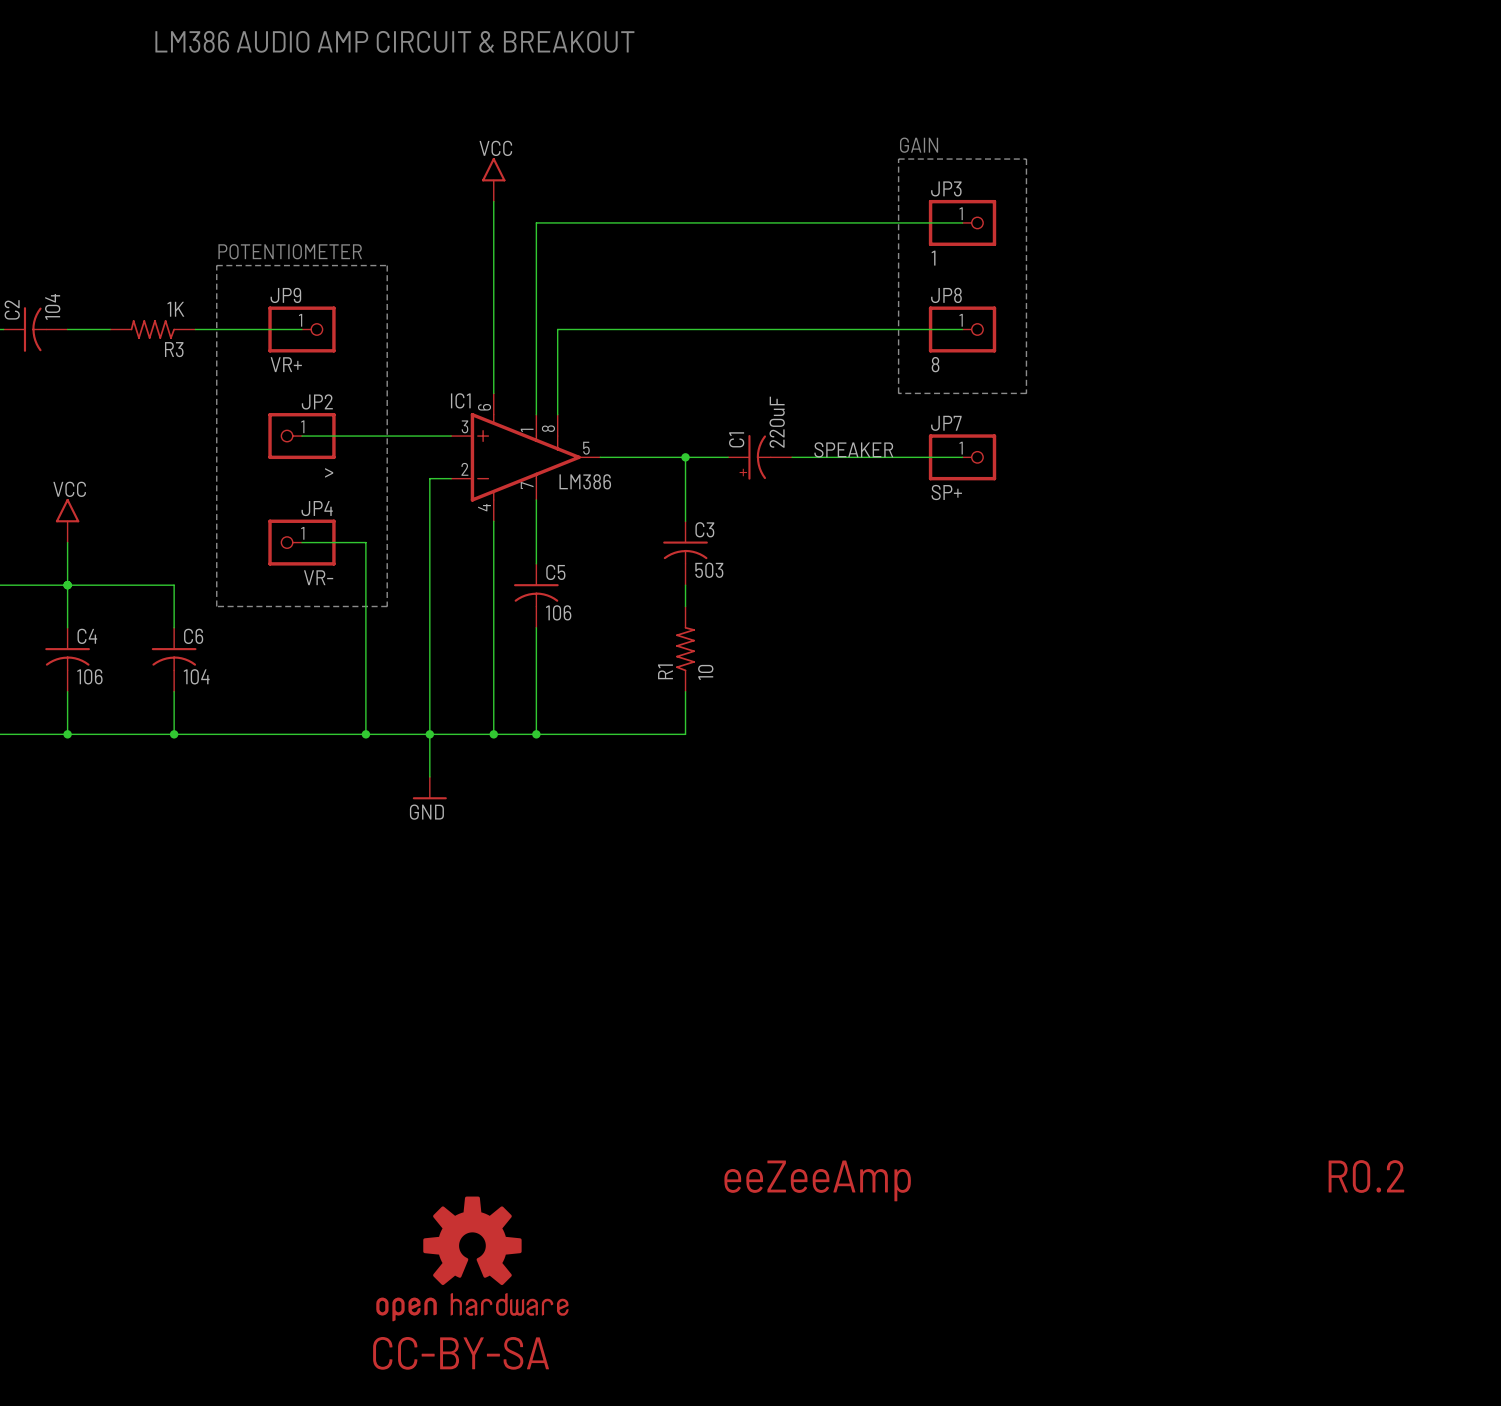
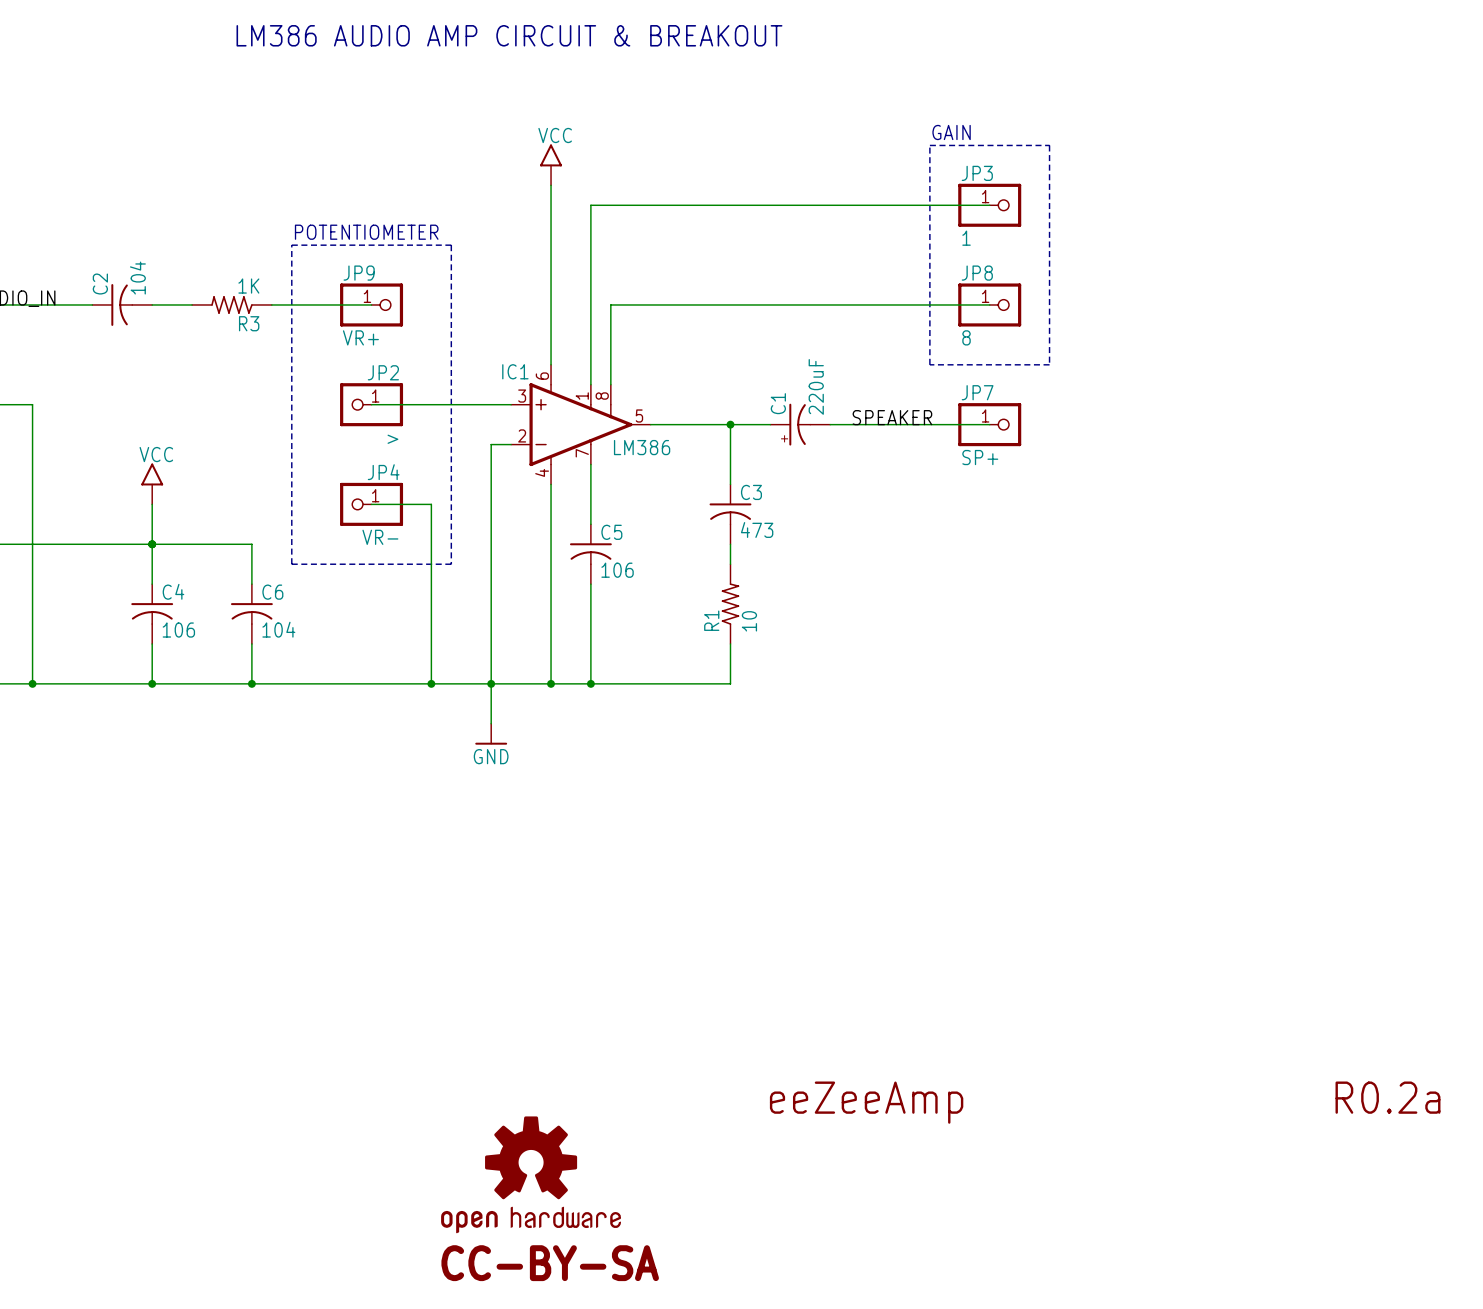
C3 value: 503 (709, 570) -> 473 (757, 529)
text: R0.2 (1366, 1176) -> R0.2a (1387, 1097)

